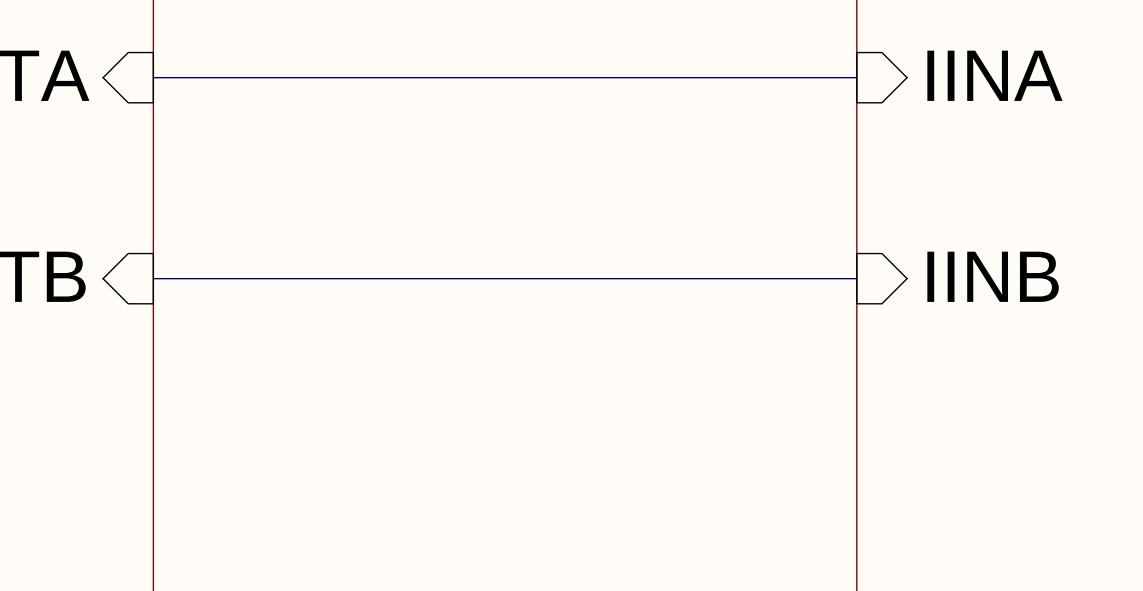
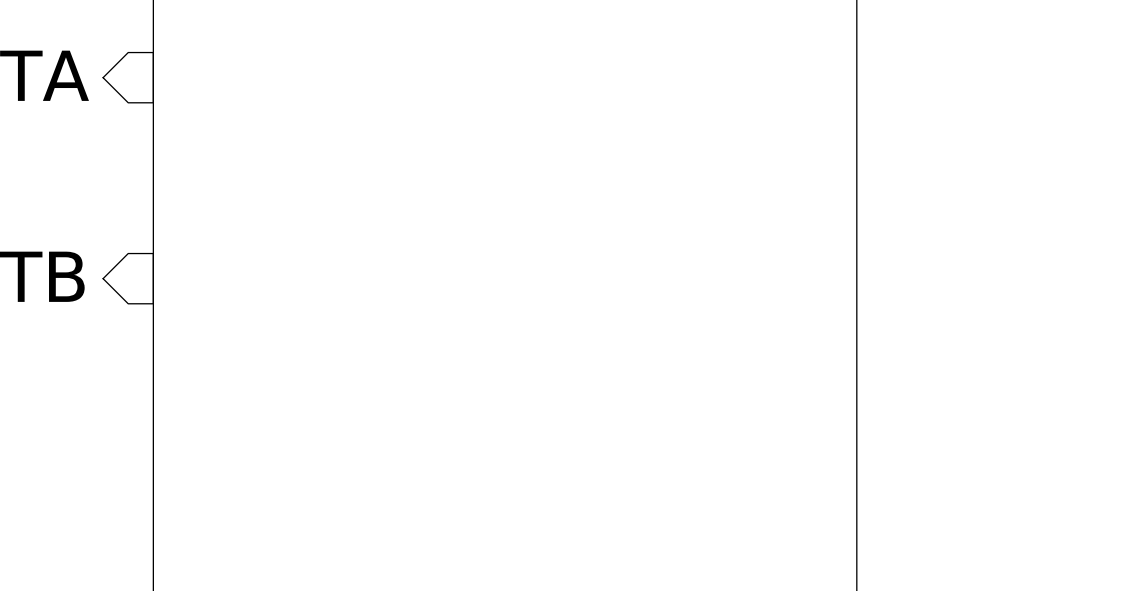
sheet pin: IINA (994, 75) -> none
wire: (153, 77) (856, 77) -> none
sheet pin: IINB (993, 276) -> none
wire: (153, 278) (856, 278) -> none

